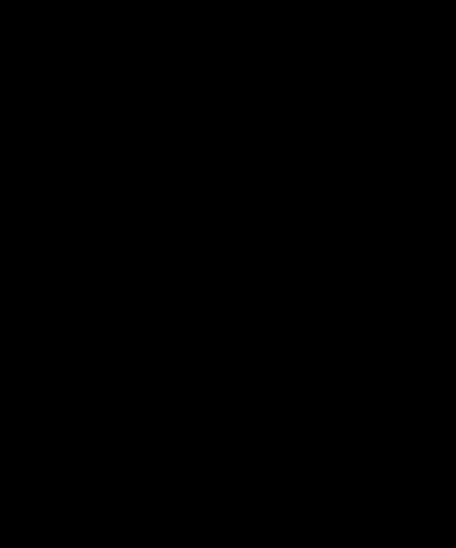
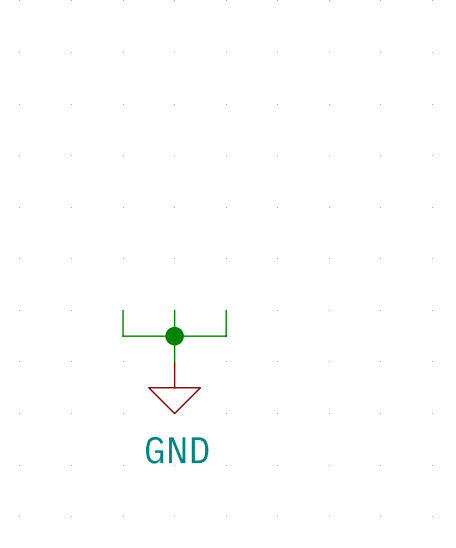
wire: none -> (123, 310) (123, 336) (226, 336) (226, 310)
wire: none -> (174, 310) (174, 361)
junction: none -> (174, 336)
power symbol: none -> GND (174, 387)

